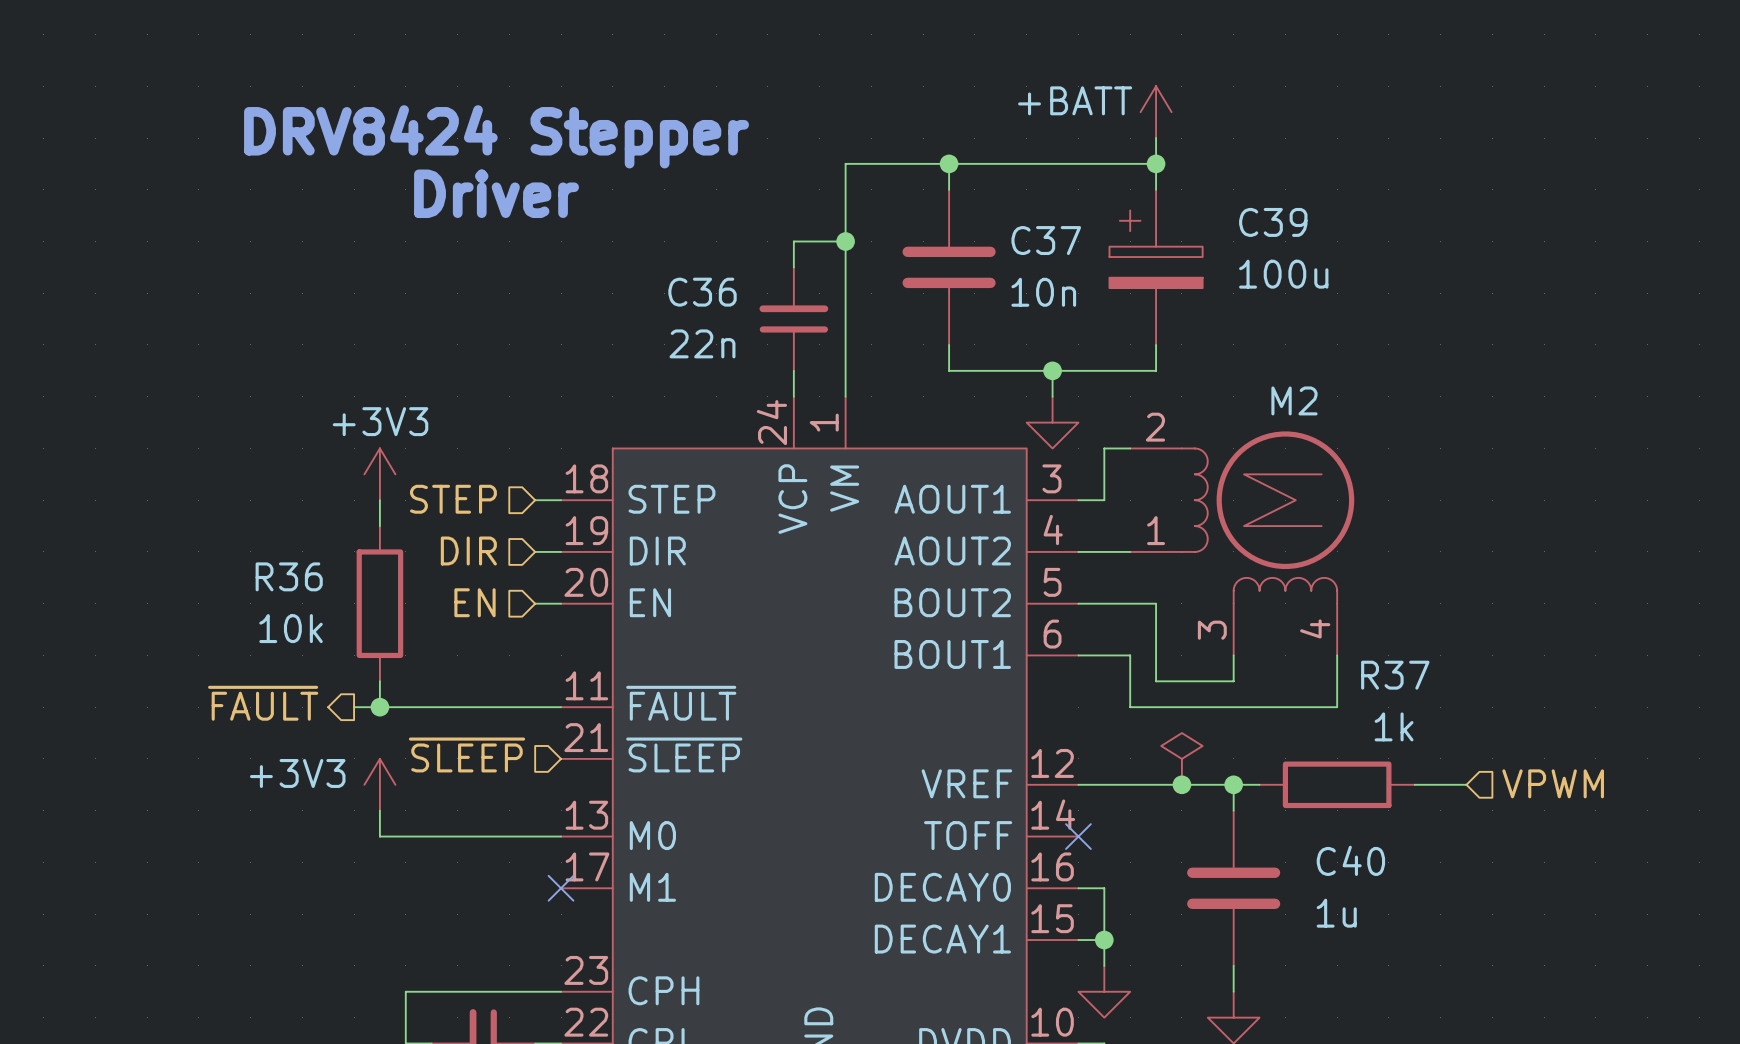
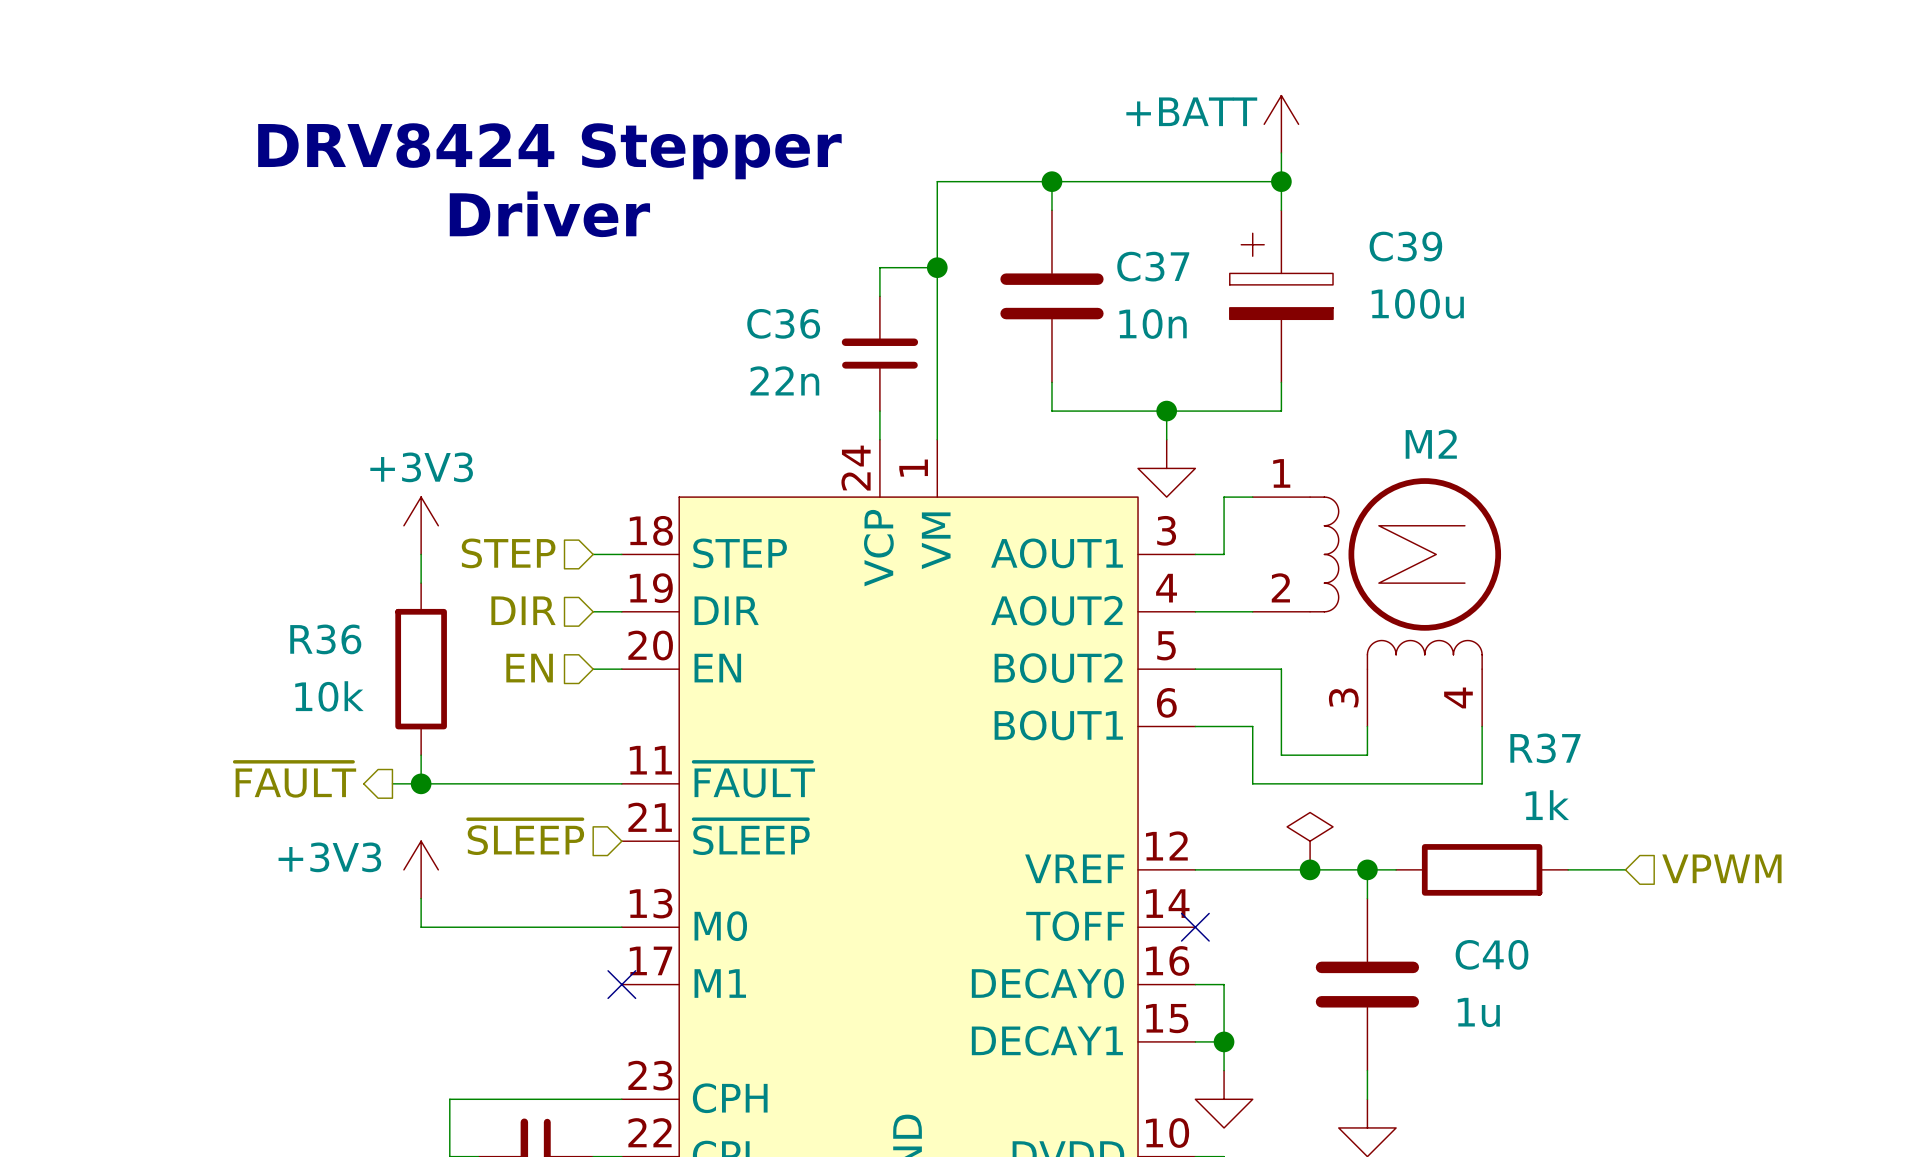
M2 pin number: 2 (1155, 427) -> 1 (1281, 473)
M2 pin number: 1 (1156, 530) -> 2 (1280, 587)

